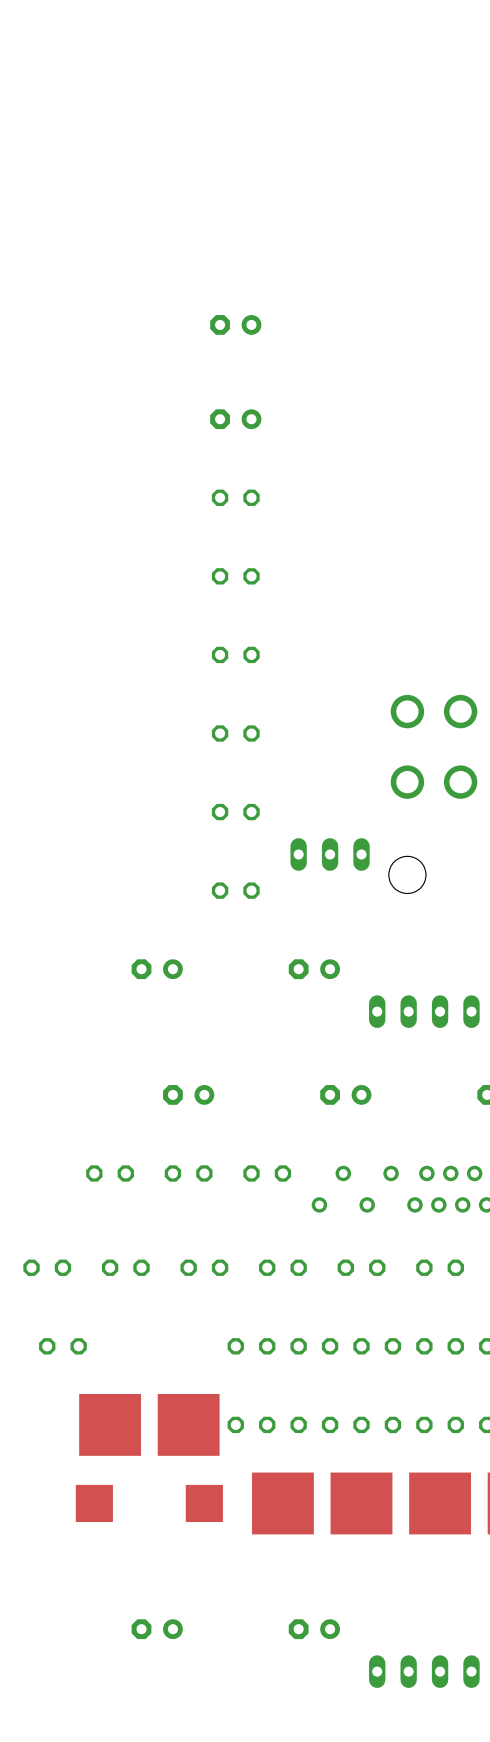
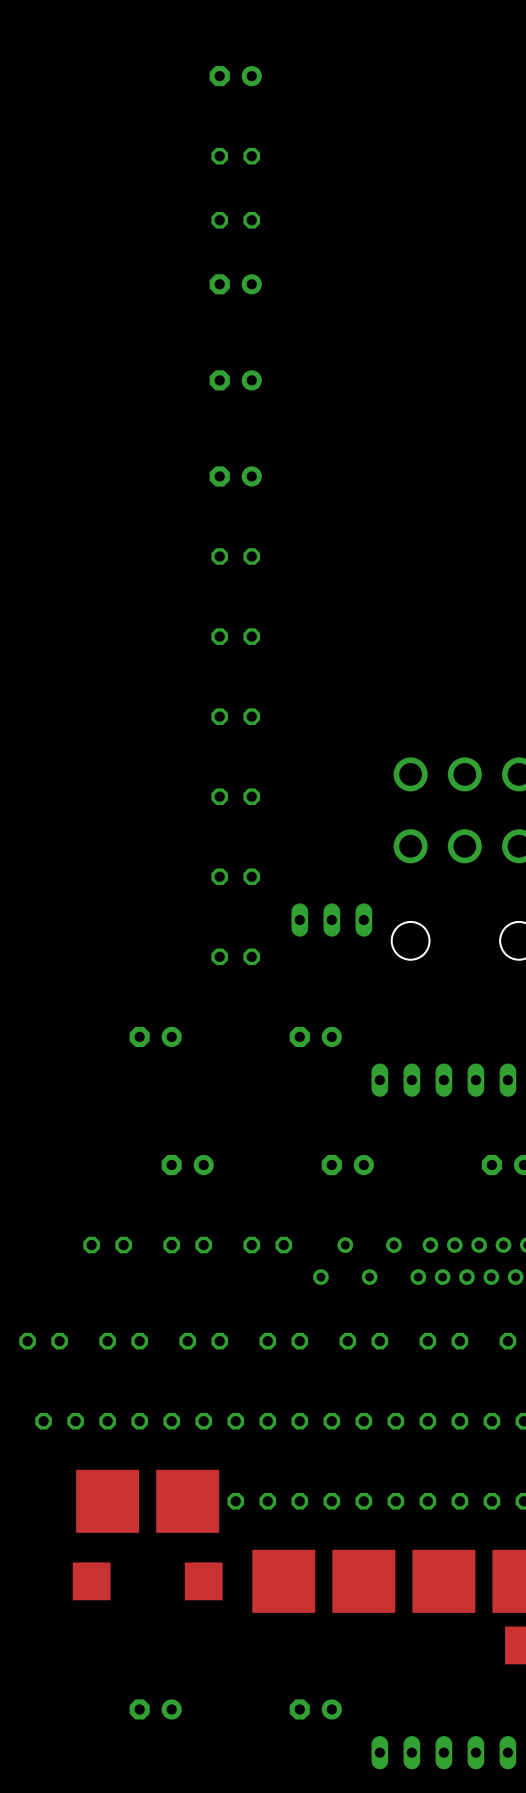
part: none -> (235, 76)
part: none -> (235, 156)
part: none -> (235, 220)
part: none -> (235, 284)
part: none -> (123, 1421)
part: none -> (187, 1421)

